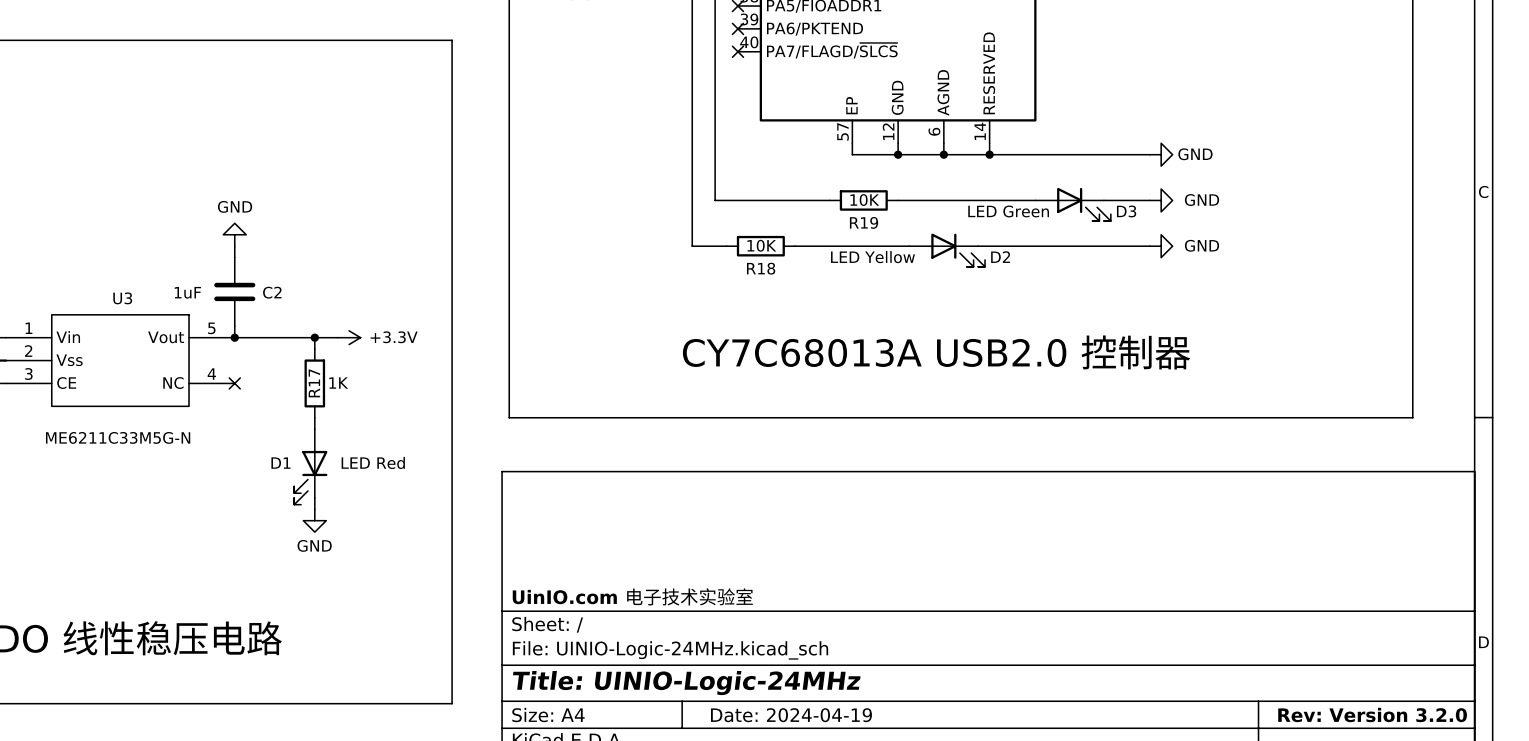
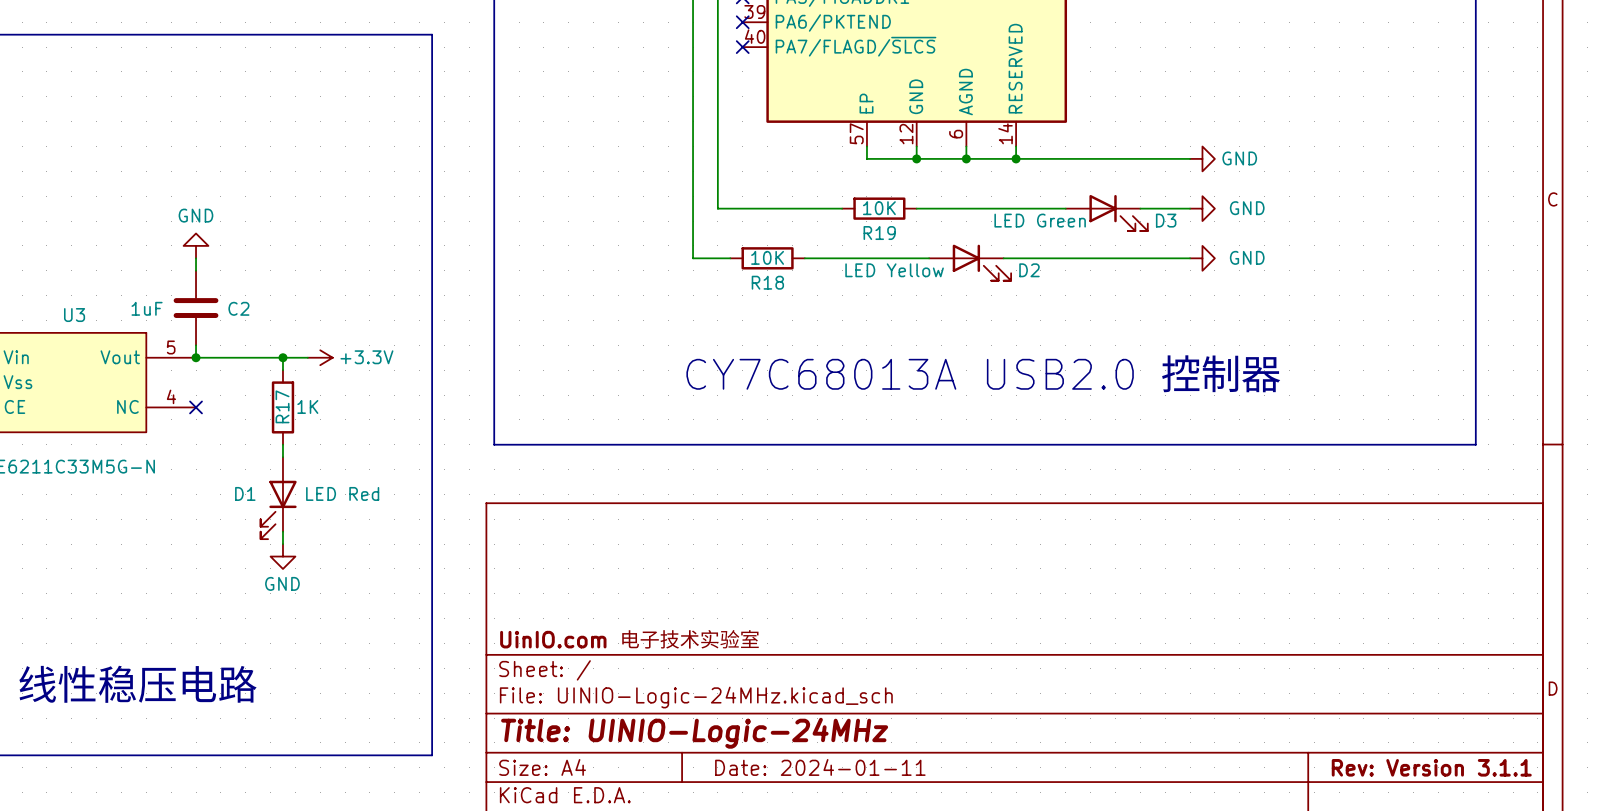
title block: Date: 2024-04-19 (791, 715) -> Date: 2024-01-11 (820, 767)
title block: Rev: Version 3.2.0 (1372, 715) -> Rev: Version 3.1.1 (1431, 767)

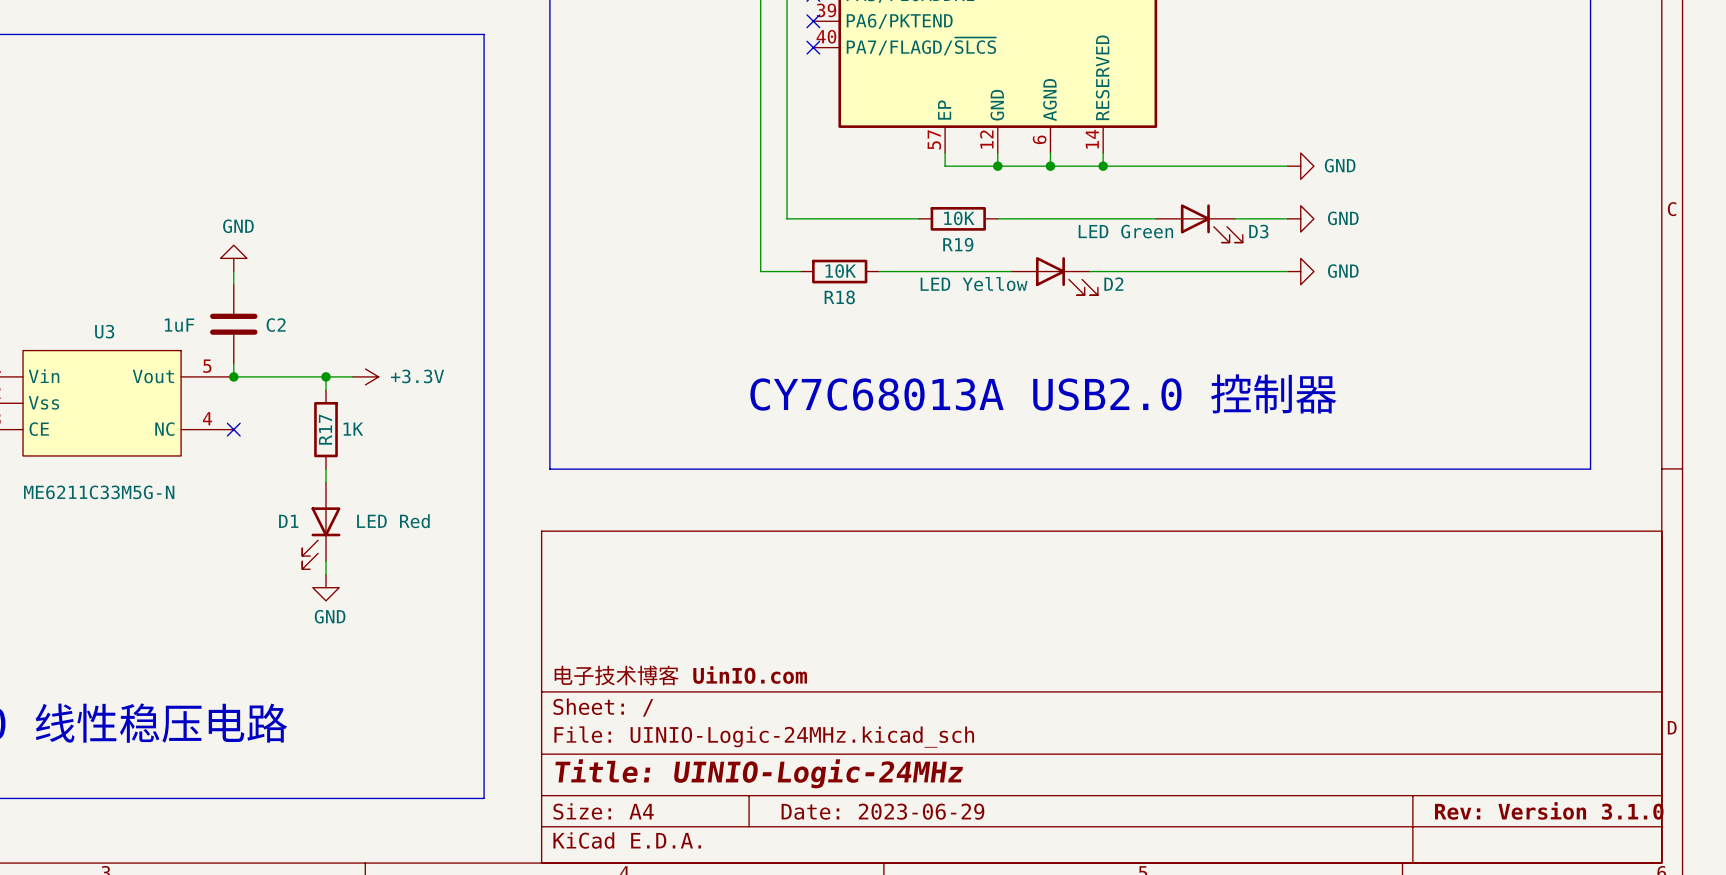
title block: UinIO.com 电子技术实验室 (630, 639) -> 电子技术博客 UinIO.com (680, 675)
title block: Date: 2024-01-11 (820, 767) -> Date: 2023-06-29 (882, 811)
title block: Rev: Version 3.1.1 (1431, 767) -> Rev: Version 3.1.0 (1549, 810)

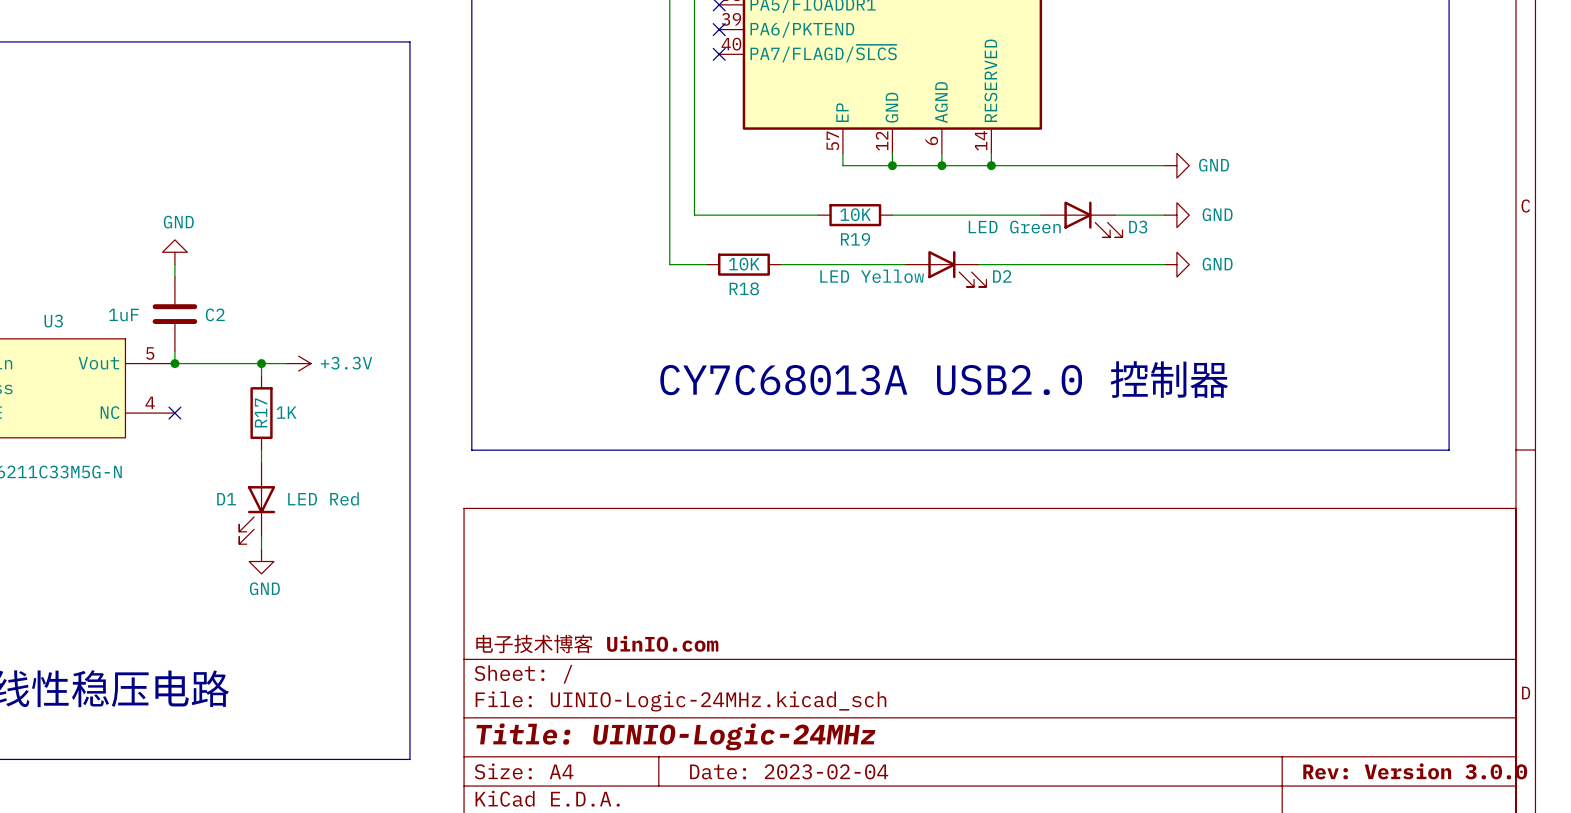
title block: Rev: Version 3.1.0 (1549, 810) -> Rev: Version 3.0.0 (1415, 771)
title block: Date: 2023-06-29 (882, 811) -> Date: 2023-02-04 (789, 771)

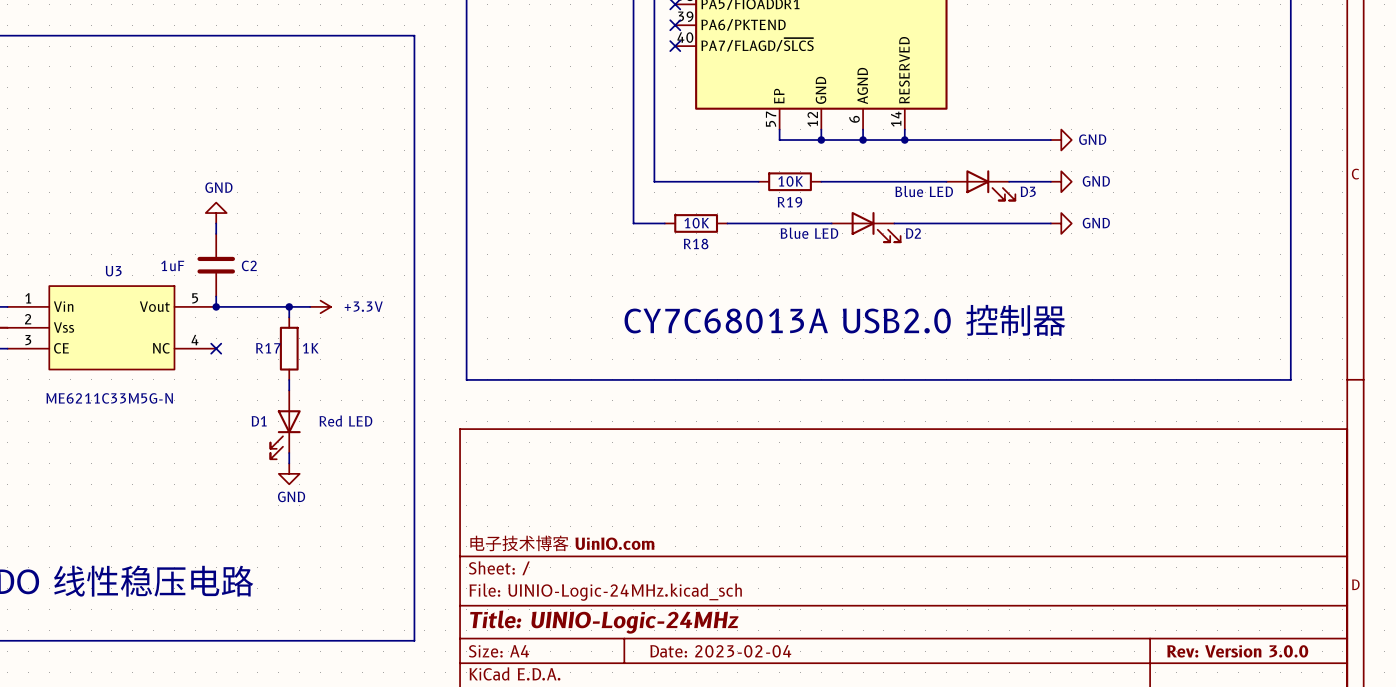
D3 value: LED Green (1014, 227) -> Blue LED (924, 191)
D2 value: LED Yellow (872, 276) -> Blue LED (809, 233)
R17 name rotation: 0° (261, 412) -> 90° clockwise (268, 348)
D1 value: LED Red (323, 498) -> Red LED (345, 421)

